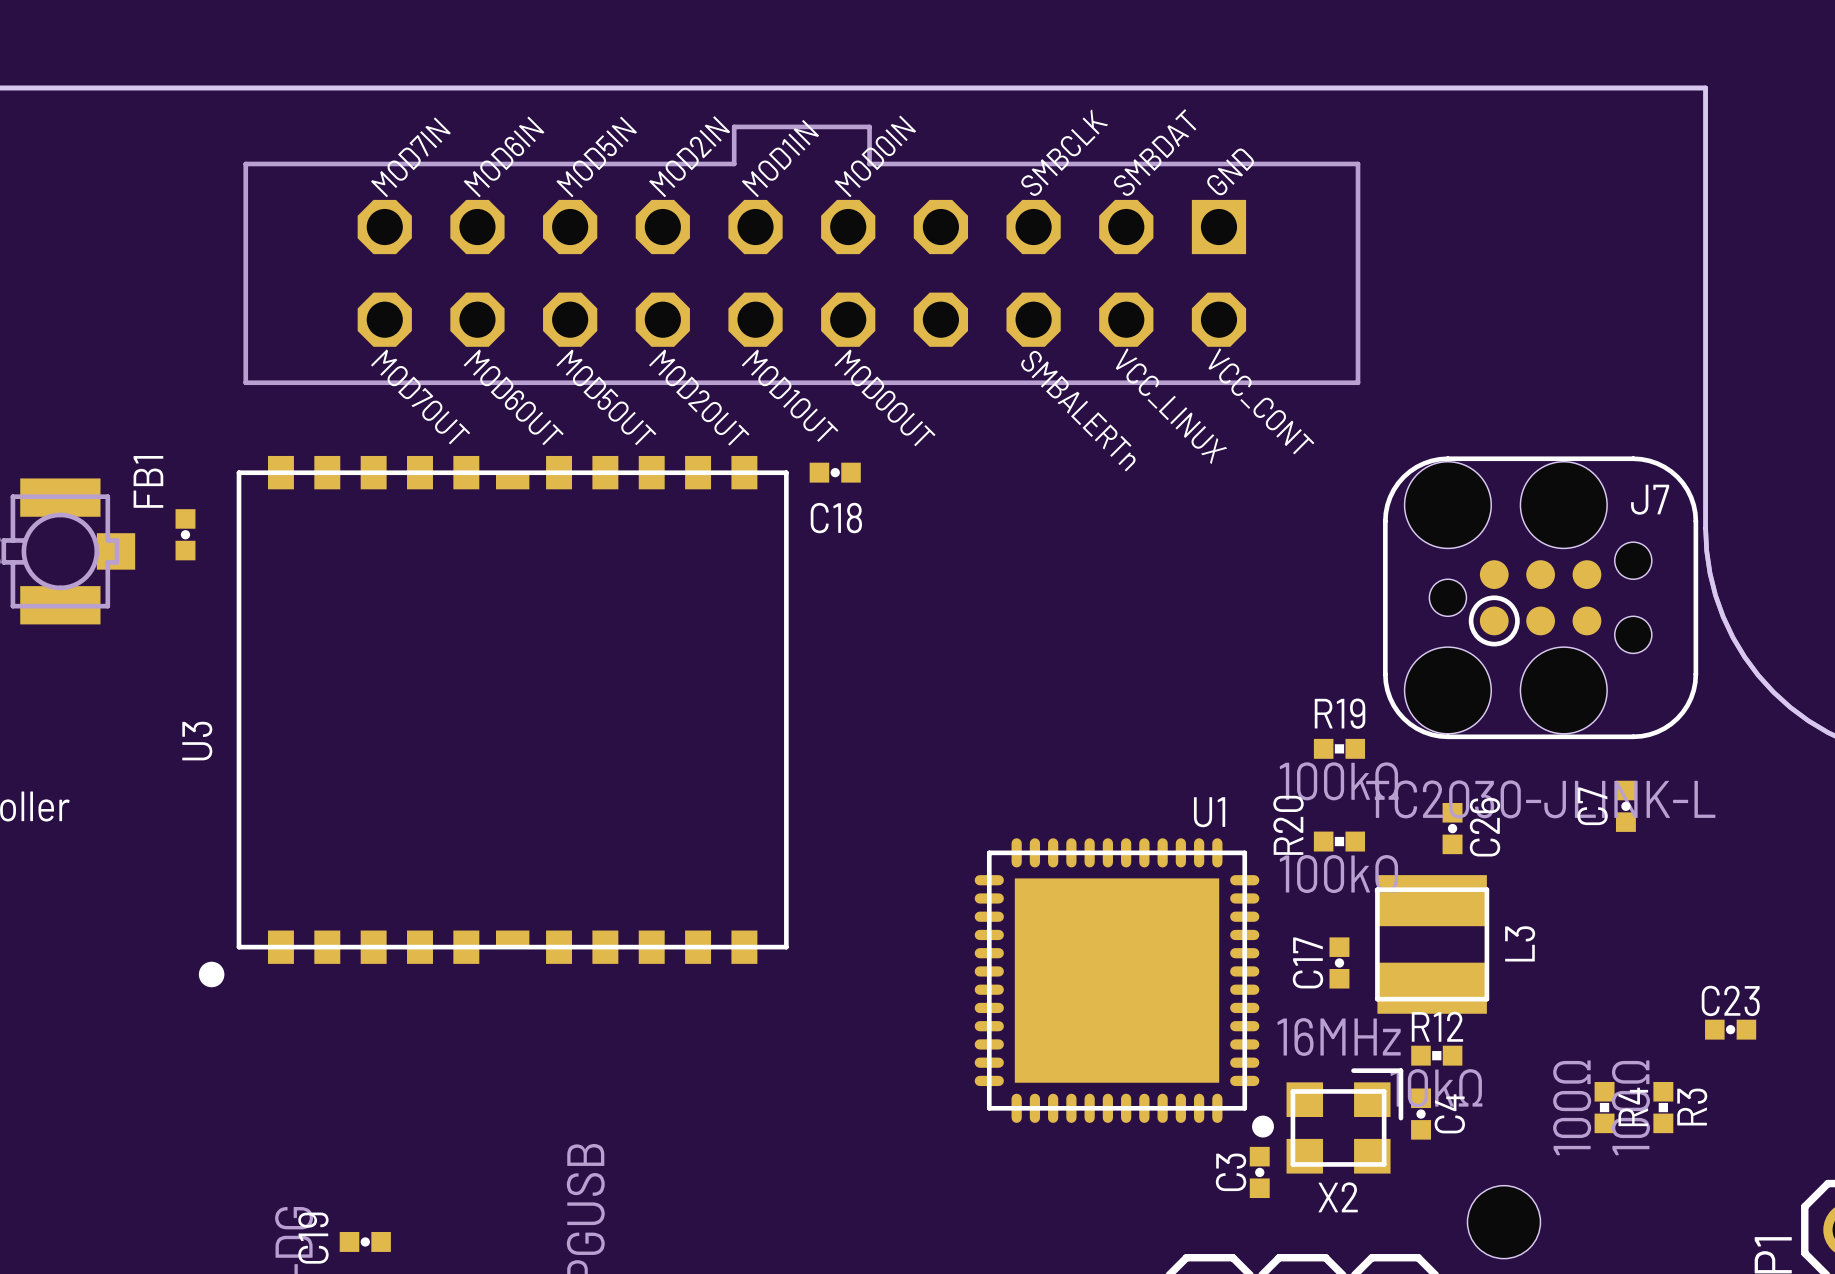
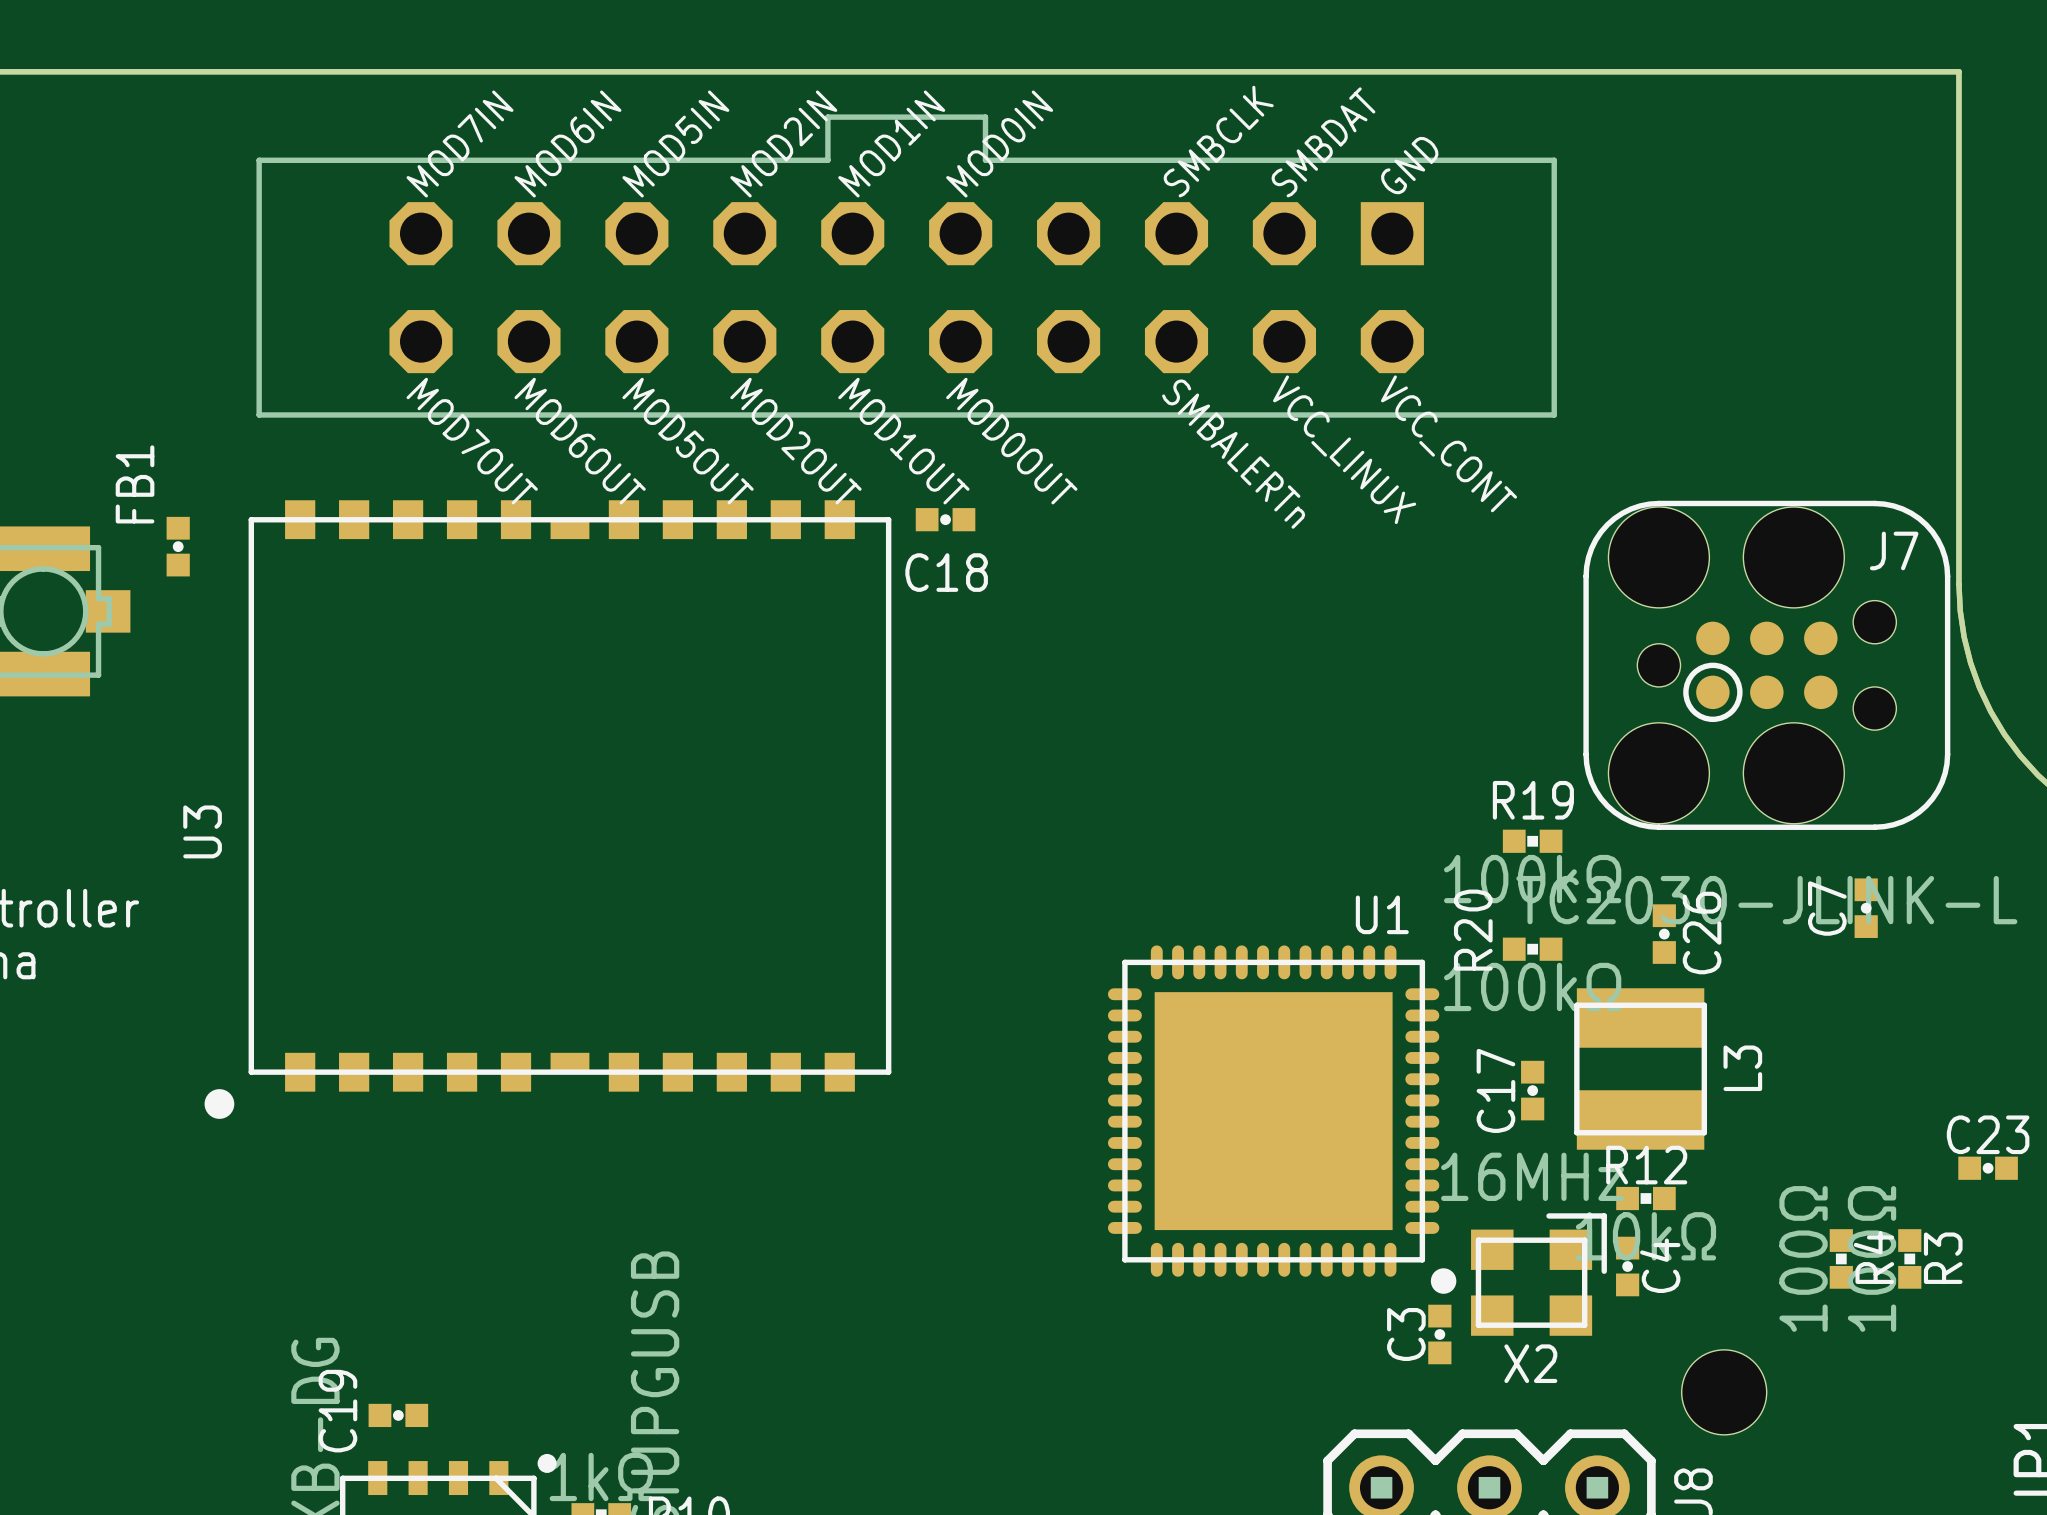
FB1 position: (185, 534) -> (178, 546)

